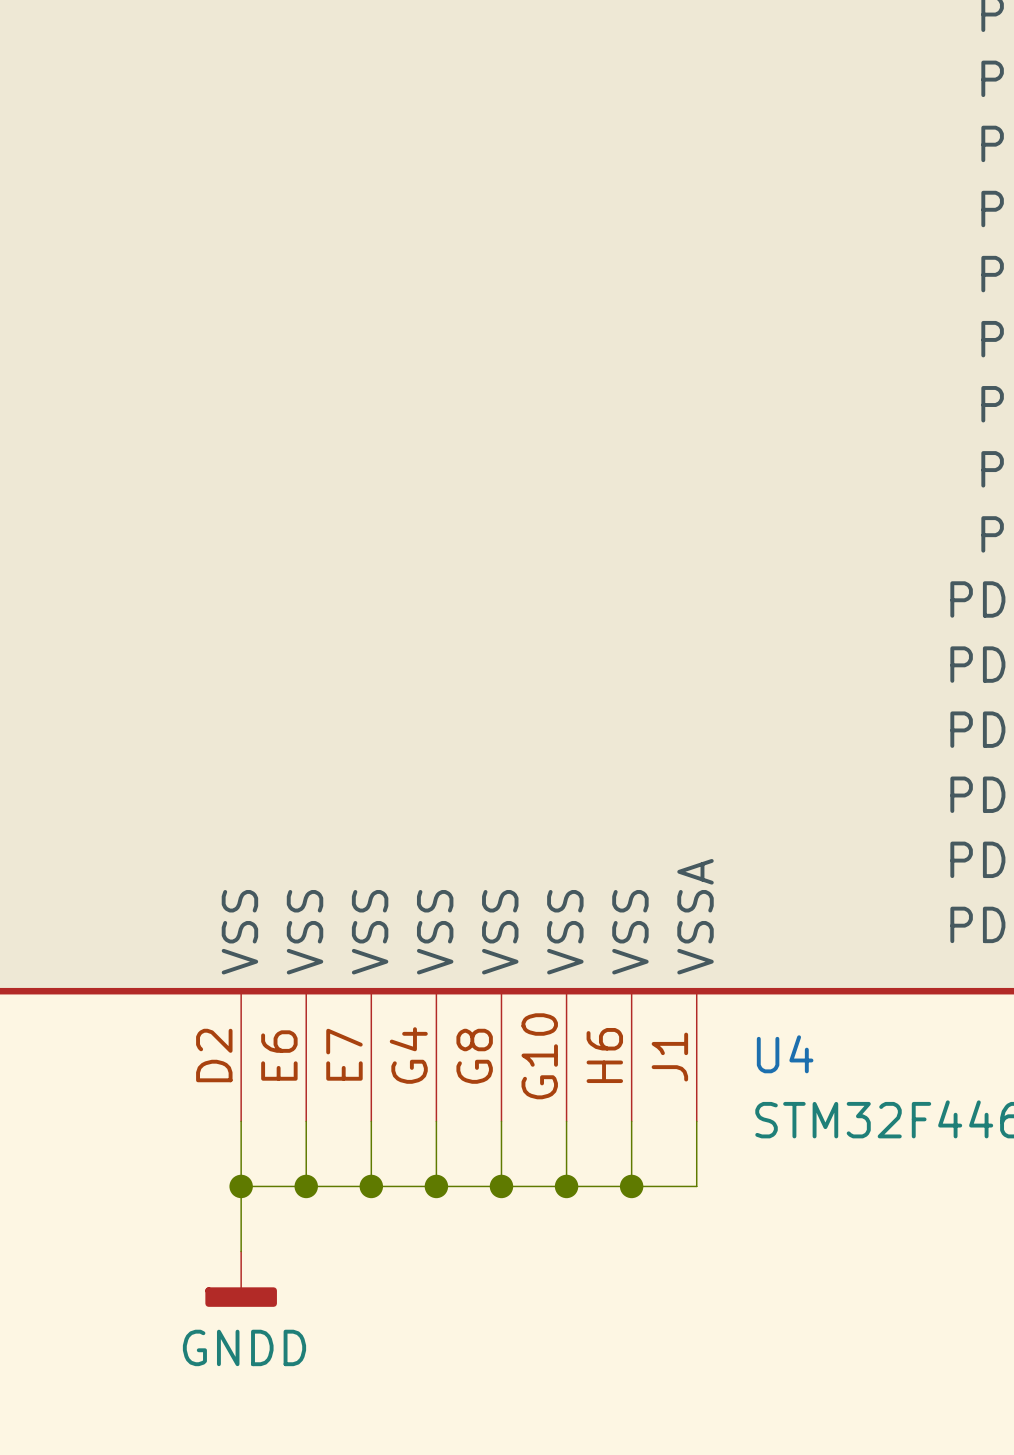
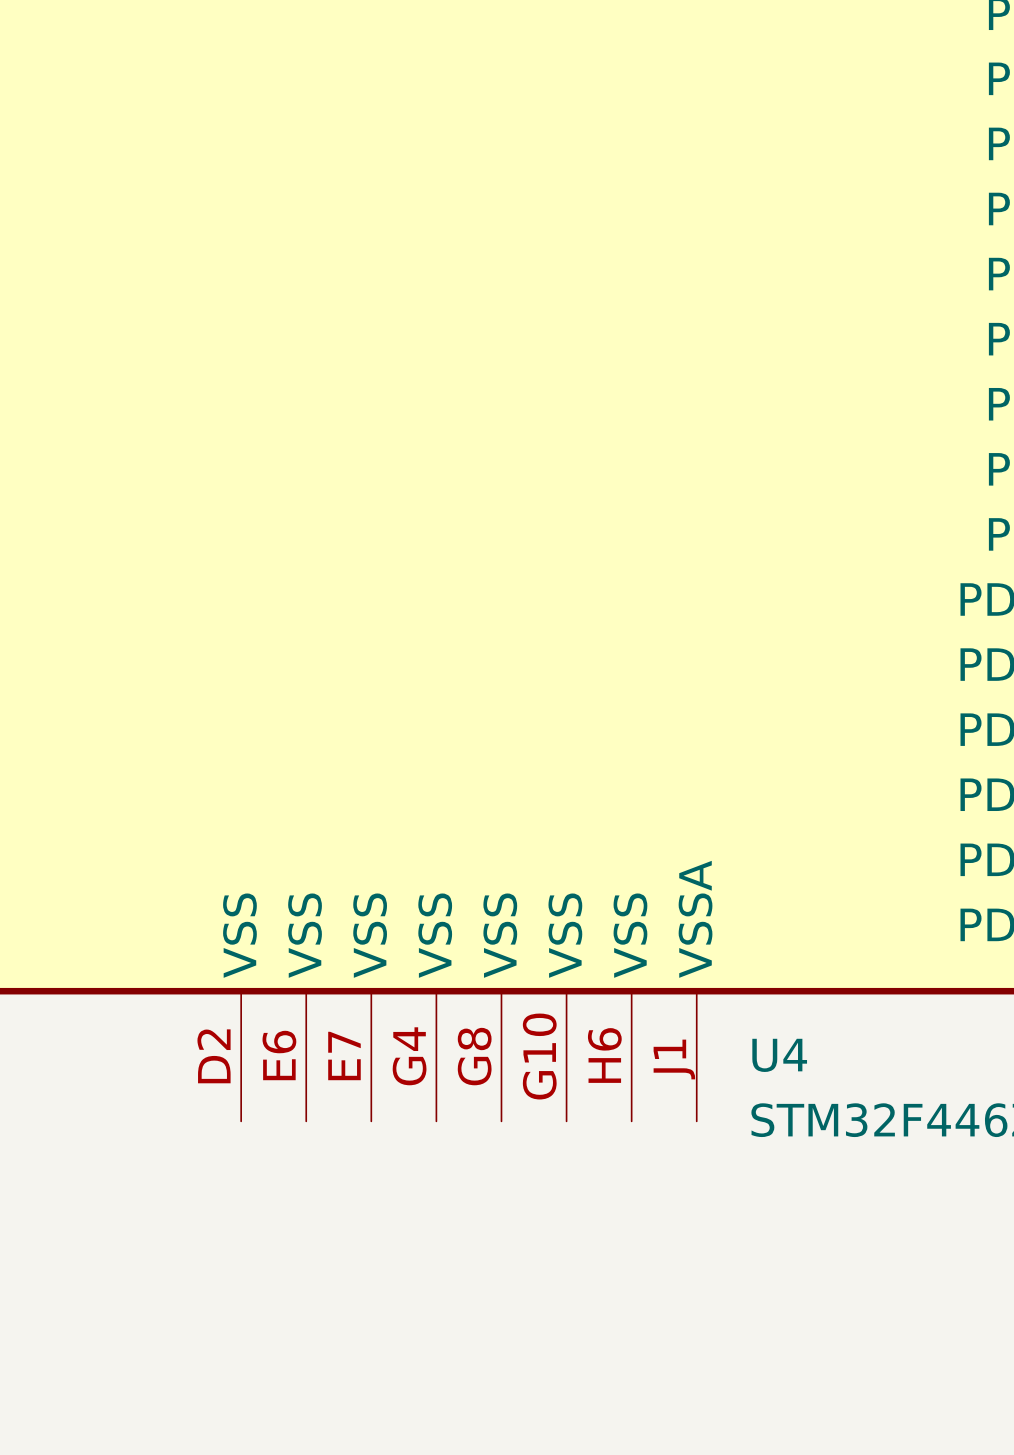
wire: (241, 1121) (241, 1251) -> none
wire: (306, 1121) (306, 1186) -> none
wire: (371, 1121) (371, 1186) -> none
wire: (436, 1121) (436, 1186) -> none
wire: (501, 1121) (501, 1186) -> none
wire: (566, 1121) (566, 1186) -> none
wire: (631, 1121) (631, 1186) -> none
wire: (696, 1121) (696, 1186) (241, 1186) -> none
junction: (241, 1186) -> none
junction: (306, 1186) -> none
junction: (371, 1186) -> none
junction: (436, 1186) -> none
junction: (501, 1186) -> none
junction: (566, 1186) -> none
junction: (631, 1186) -> none
power symbol: GNDD (241, 1279) -> none

